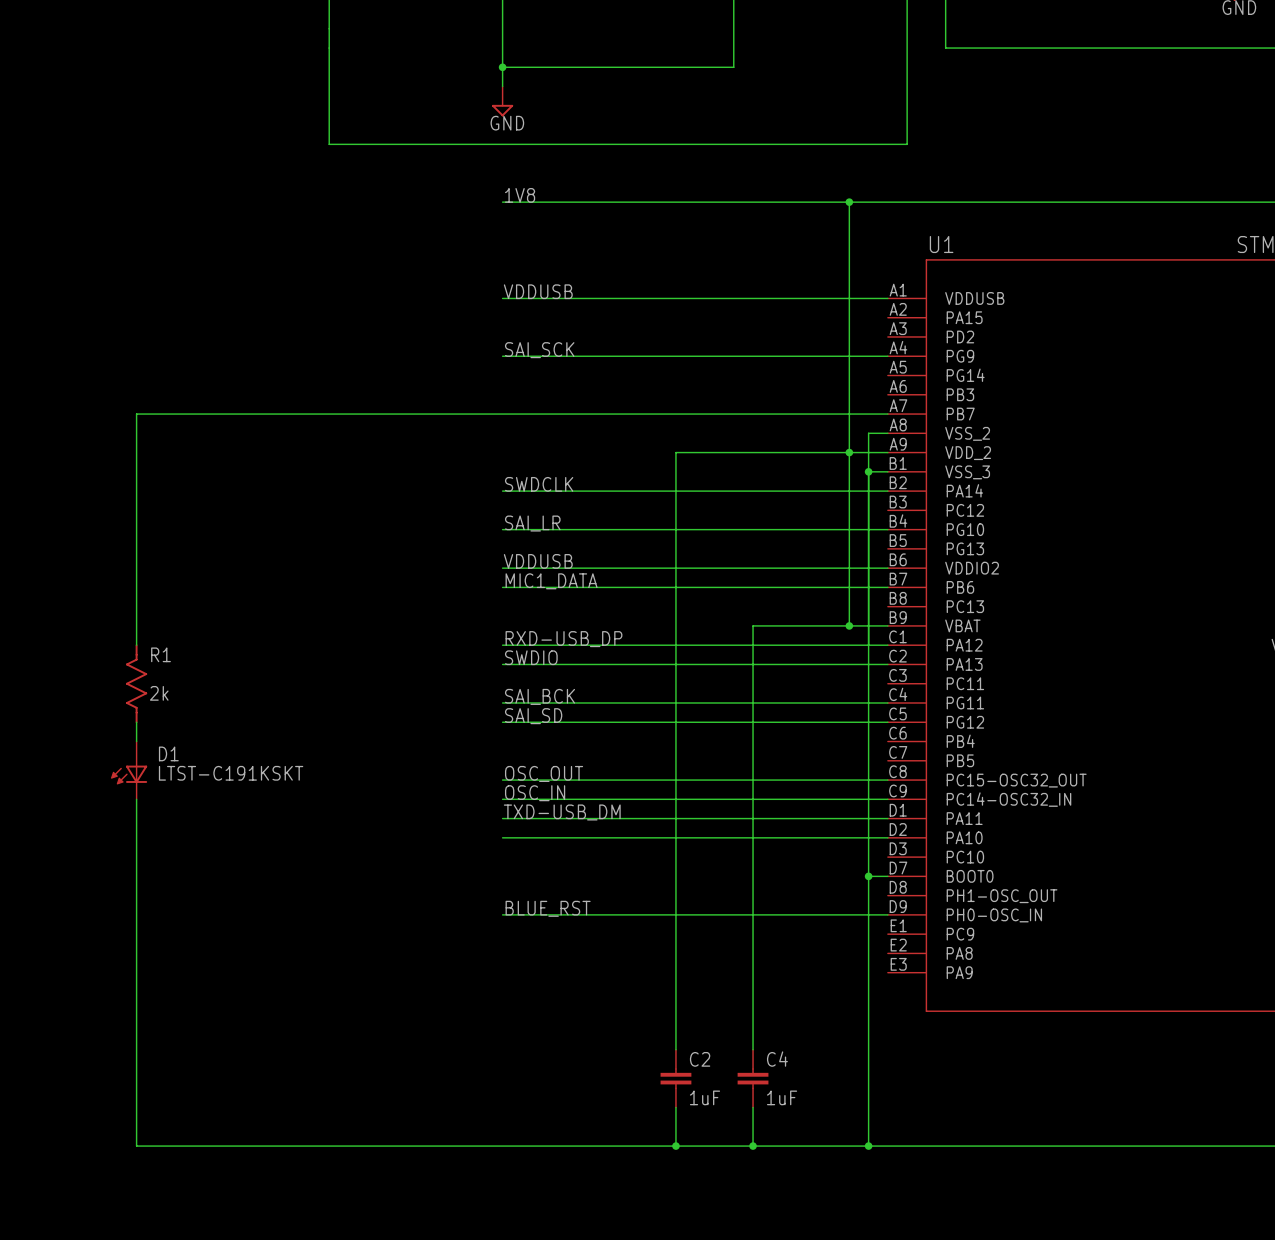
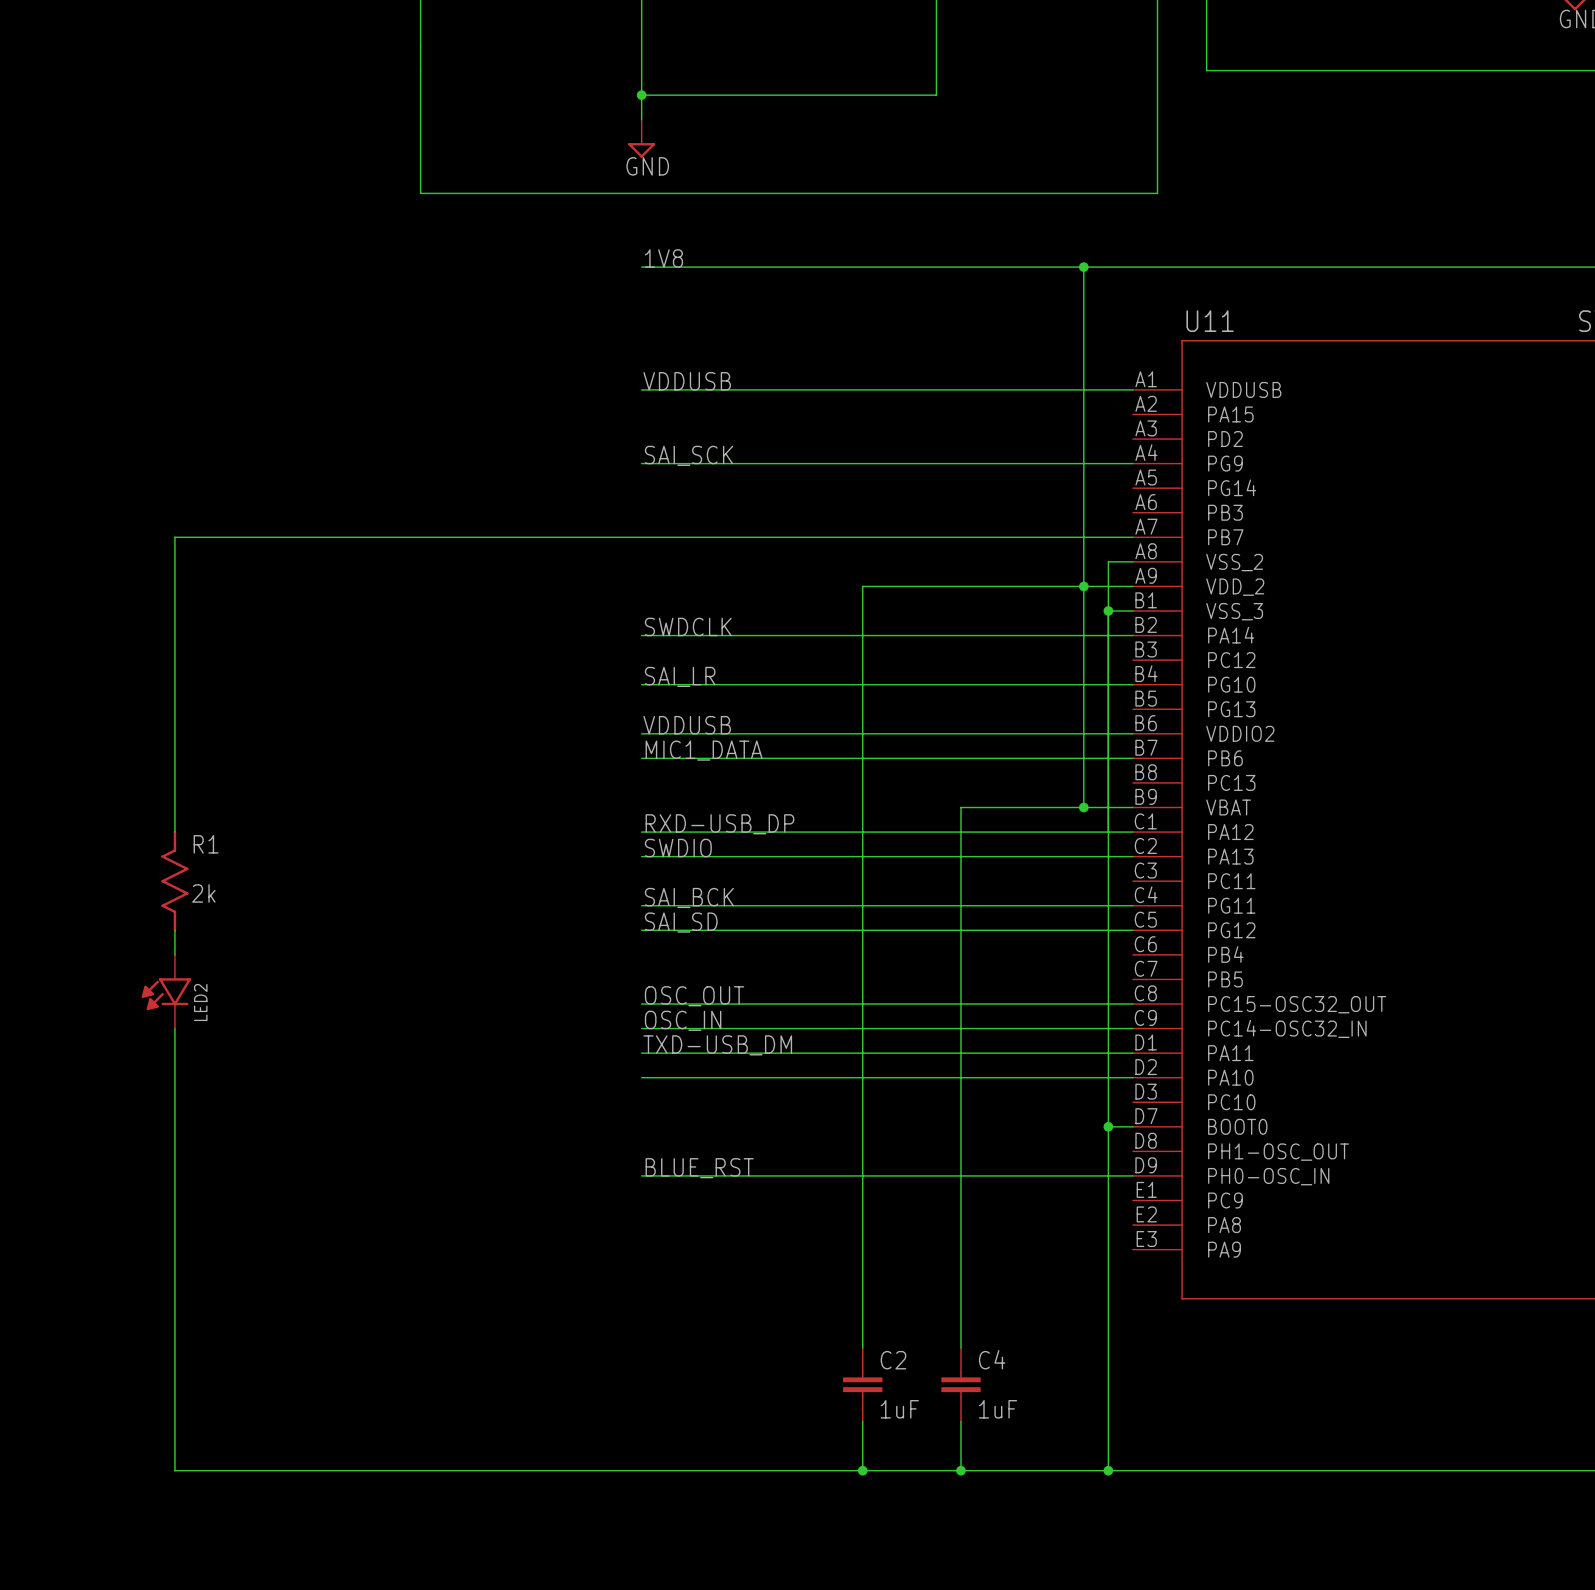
U1 name: U1 (941, 244) -> U11 (1210, 321)
D1: LTST-C191KSKT (129, 770) -> none
LED2: none -> (166, 991)

